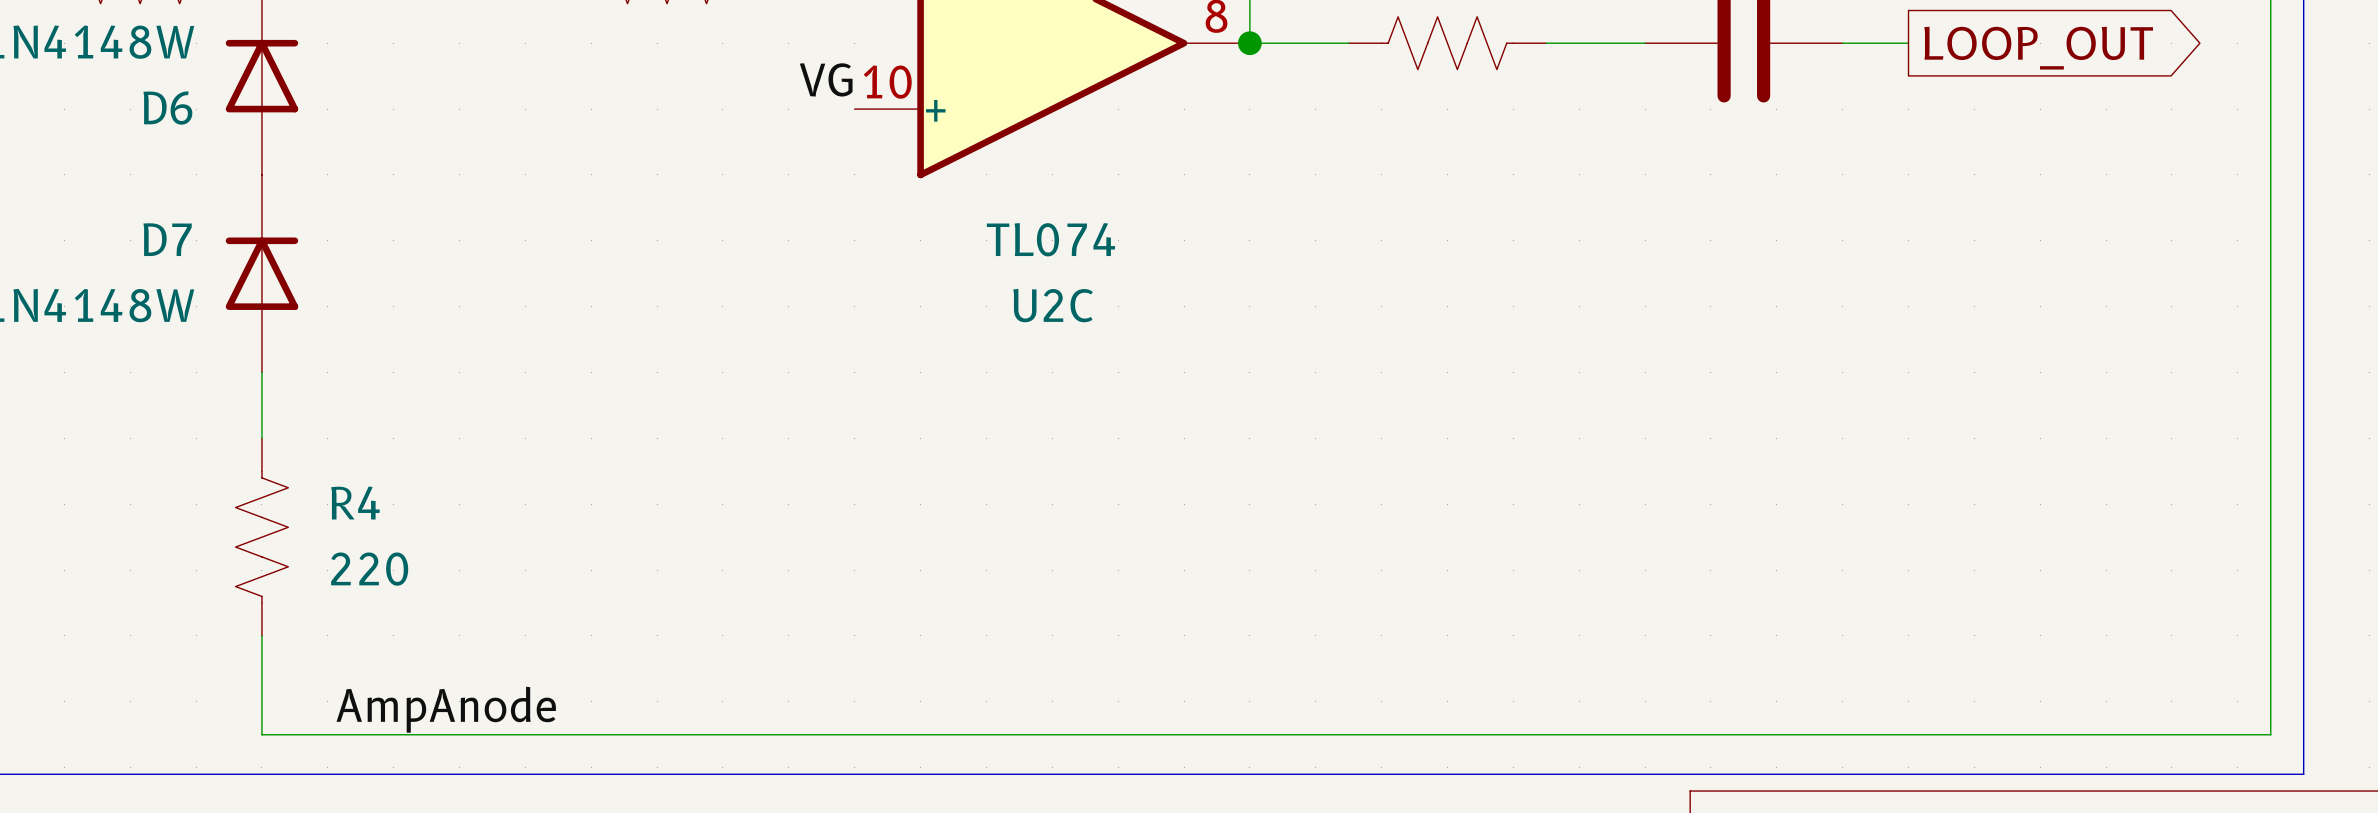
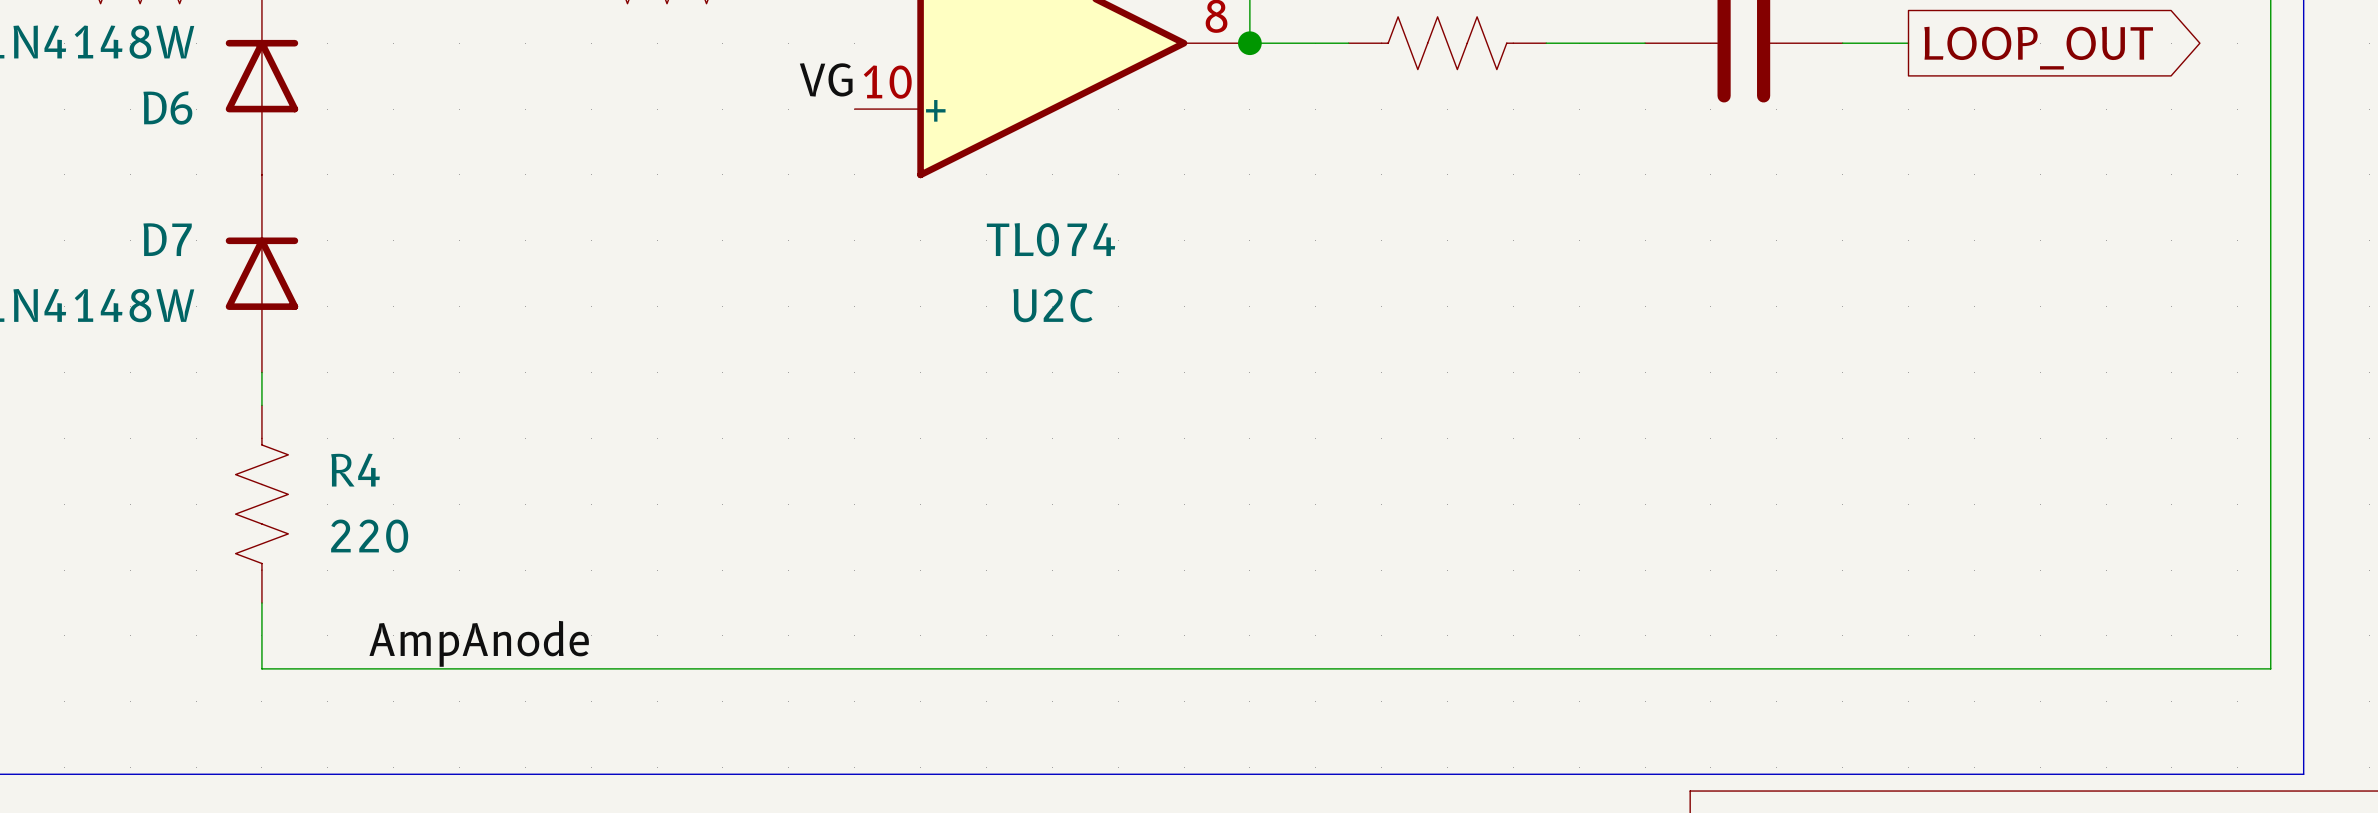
R4 position: (261, 537) -> (261, 504)
wire: (261, 668) (261, 734) (2270, 734) (2270, 668) -> (261, 668) (2270, 668)
label position: AmpAnode (446, 709) -> AmpAnode (479, 643)

